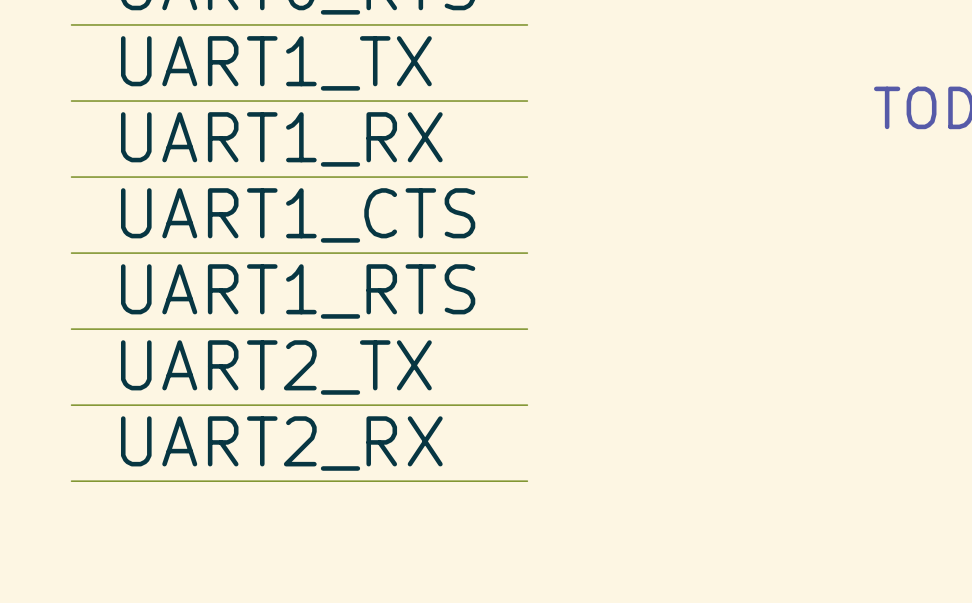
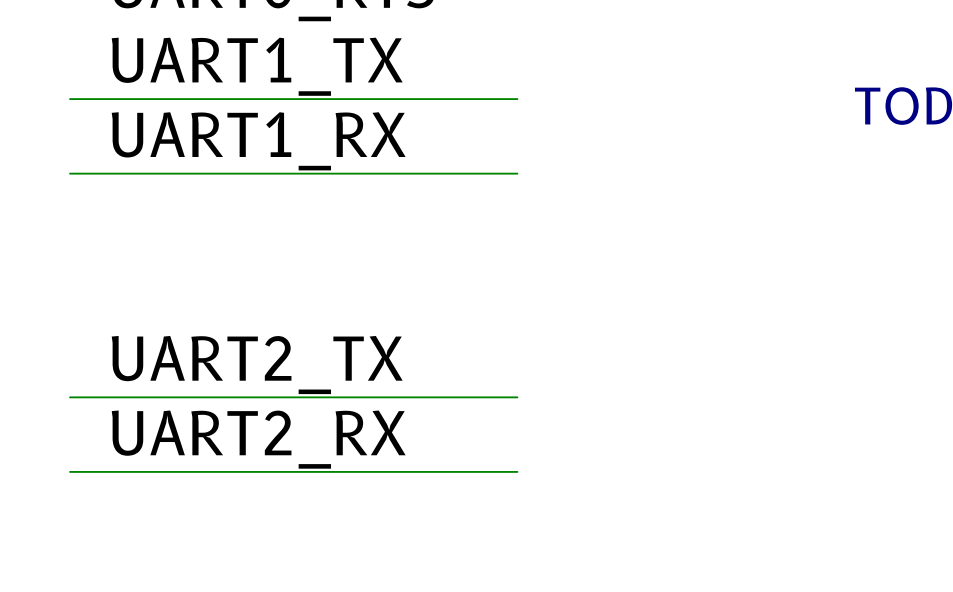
wire: (71, 24) (527, 24) -> none
label: UART1_CTS (298, 215) -> none
wire: (71, 253) (527, 253) -> none
label: UART1_RTS (298, 291) -> none
wire: (71, 329) (527, 329) -> none

